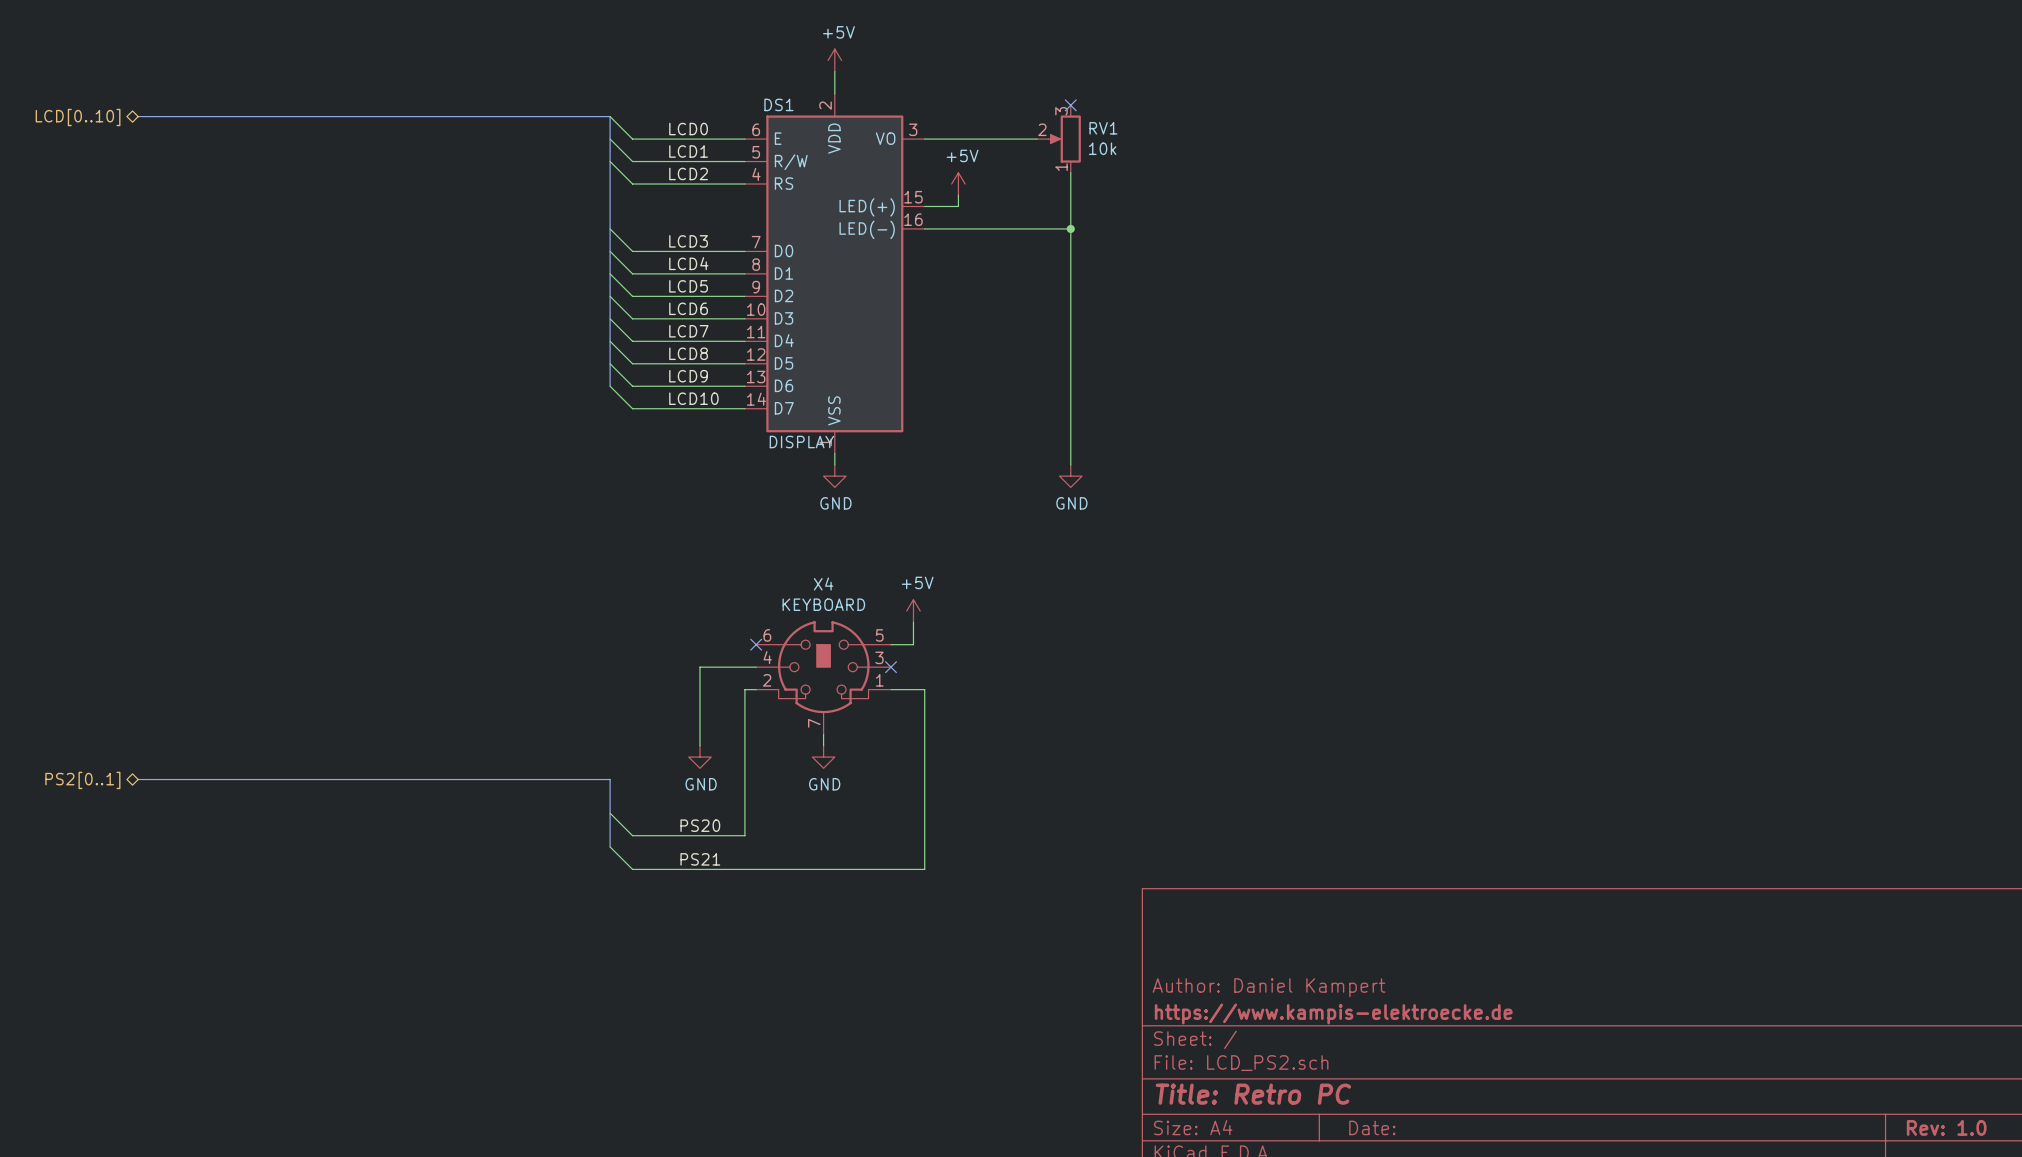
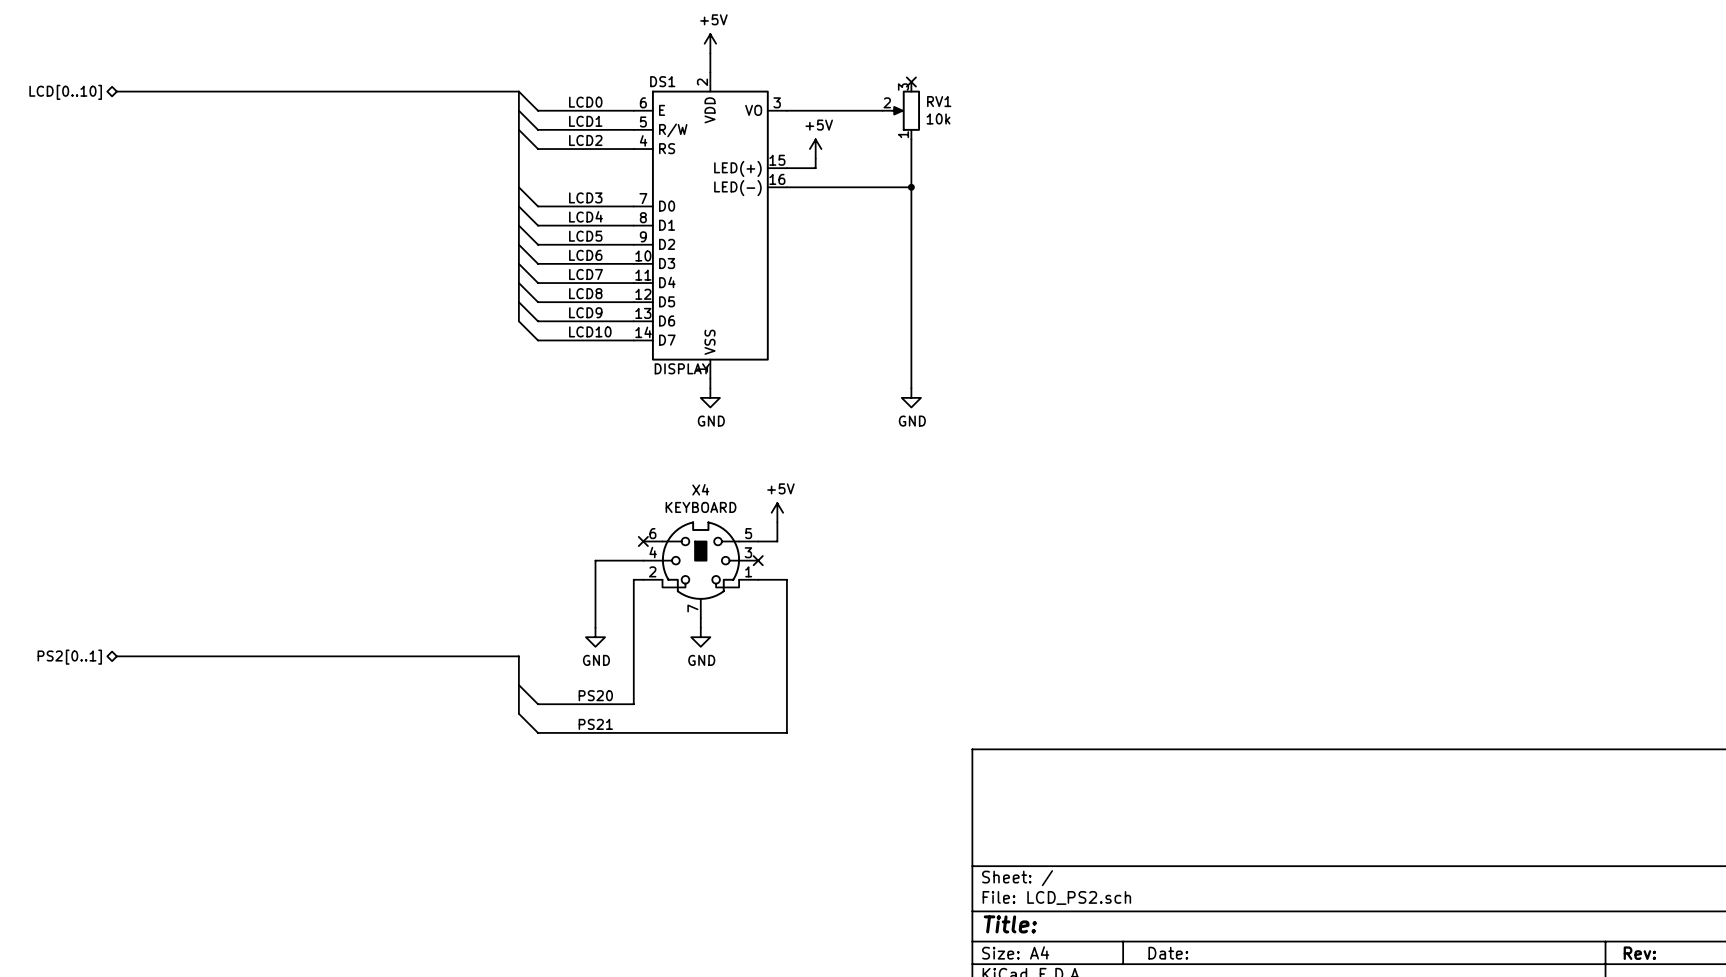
title block: Author: Daniel Kampert (1269, 987) -> none
title block: https://www.kampis-elektroecke.de (1333, 1013) -> none
title block: Title: Retro PC (1253, 1094) -> Title: (1010, 924)
title block: Rev: 1.0 (1946, 1127) -> Rev: (1639, 953)

